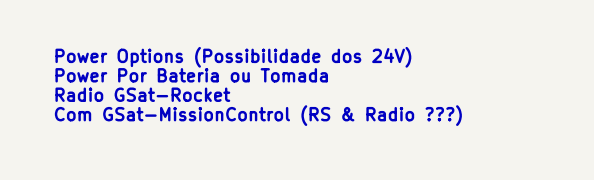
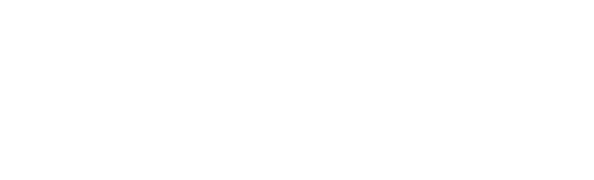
text: Power Options (Possibilidade dos 24V) (233, 57) -> none
text: Power Por Bateria ou Tomada (191, 75) -> none
text: Radio GSat-Rocket (142, 94) -> none
text: Com GSat-MissionControl (RS & Radio ???) (258, 115) -> none

